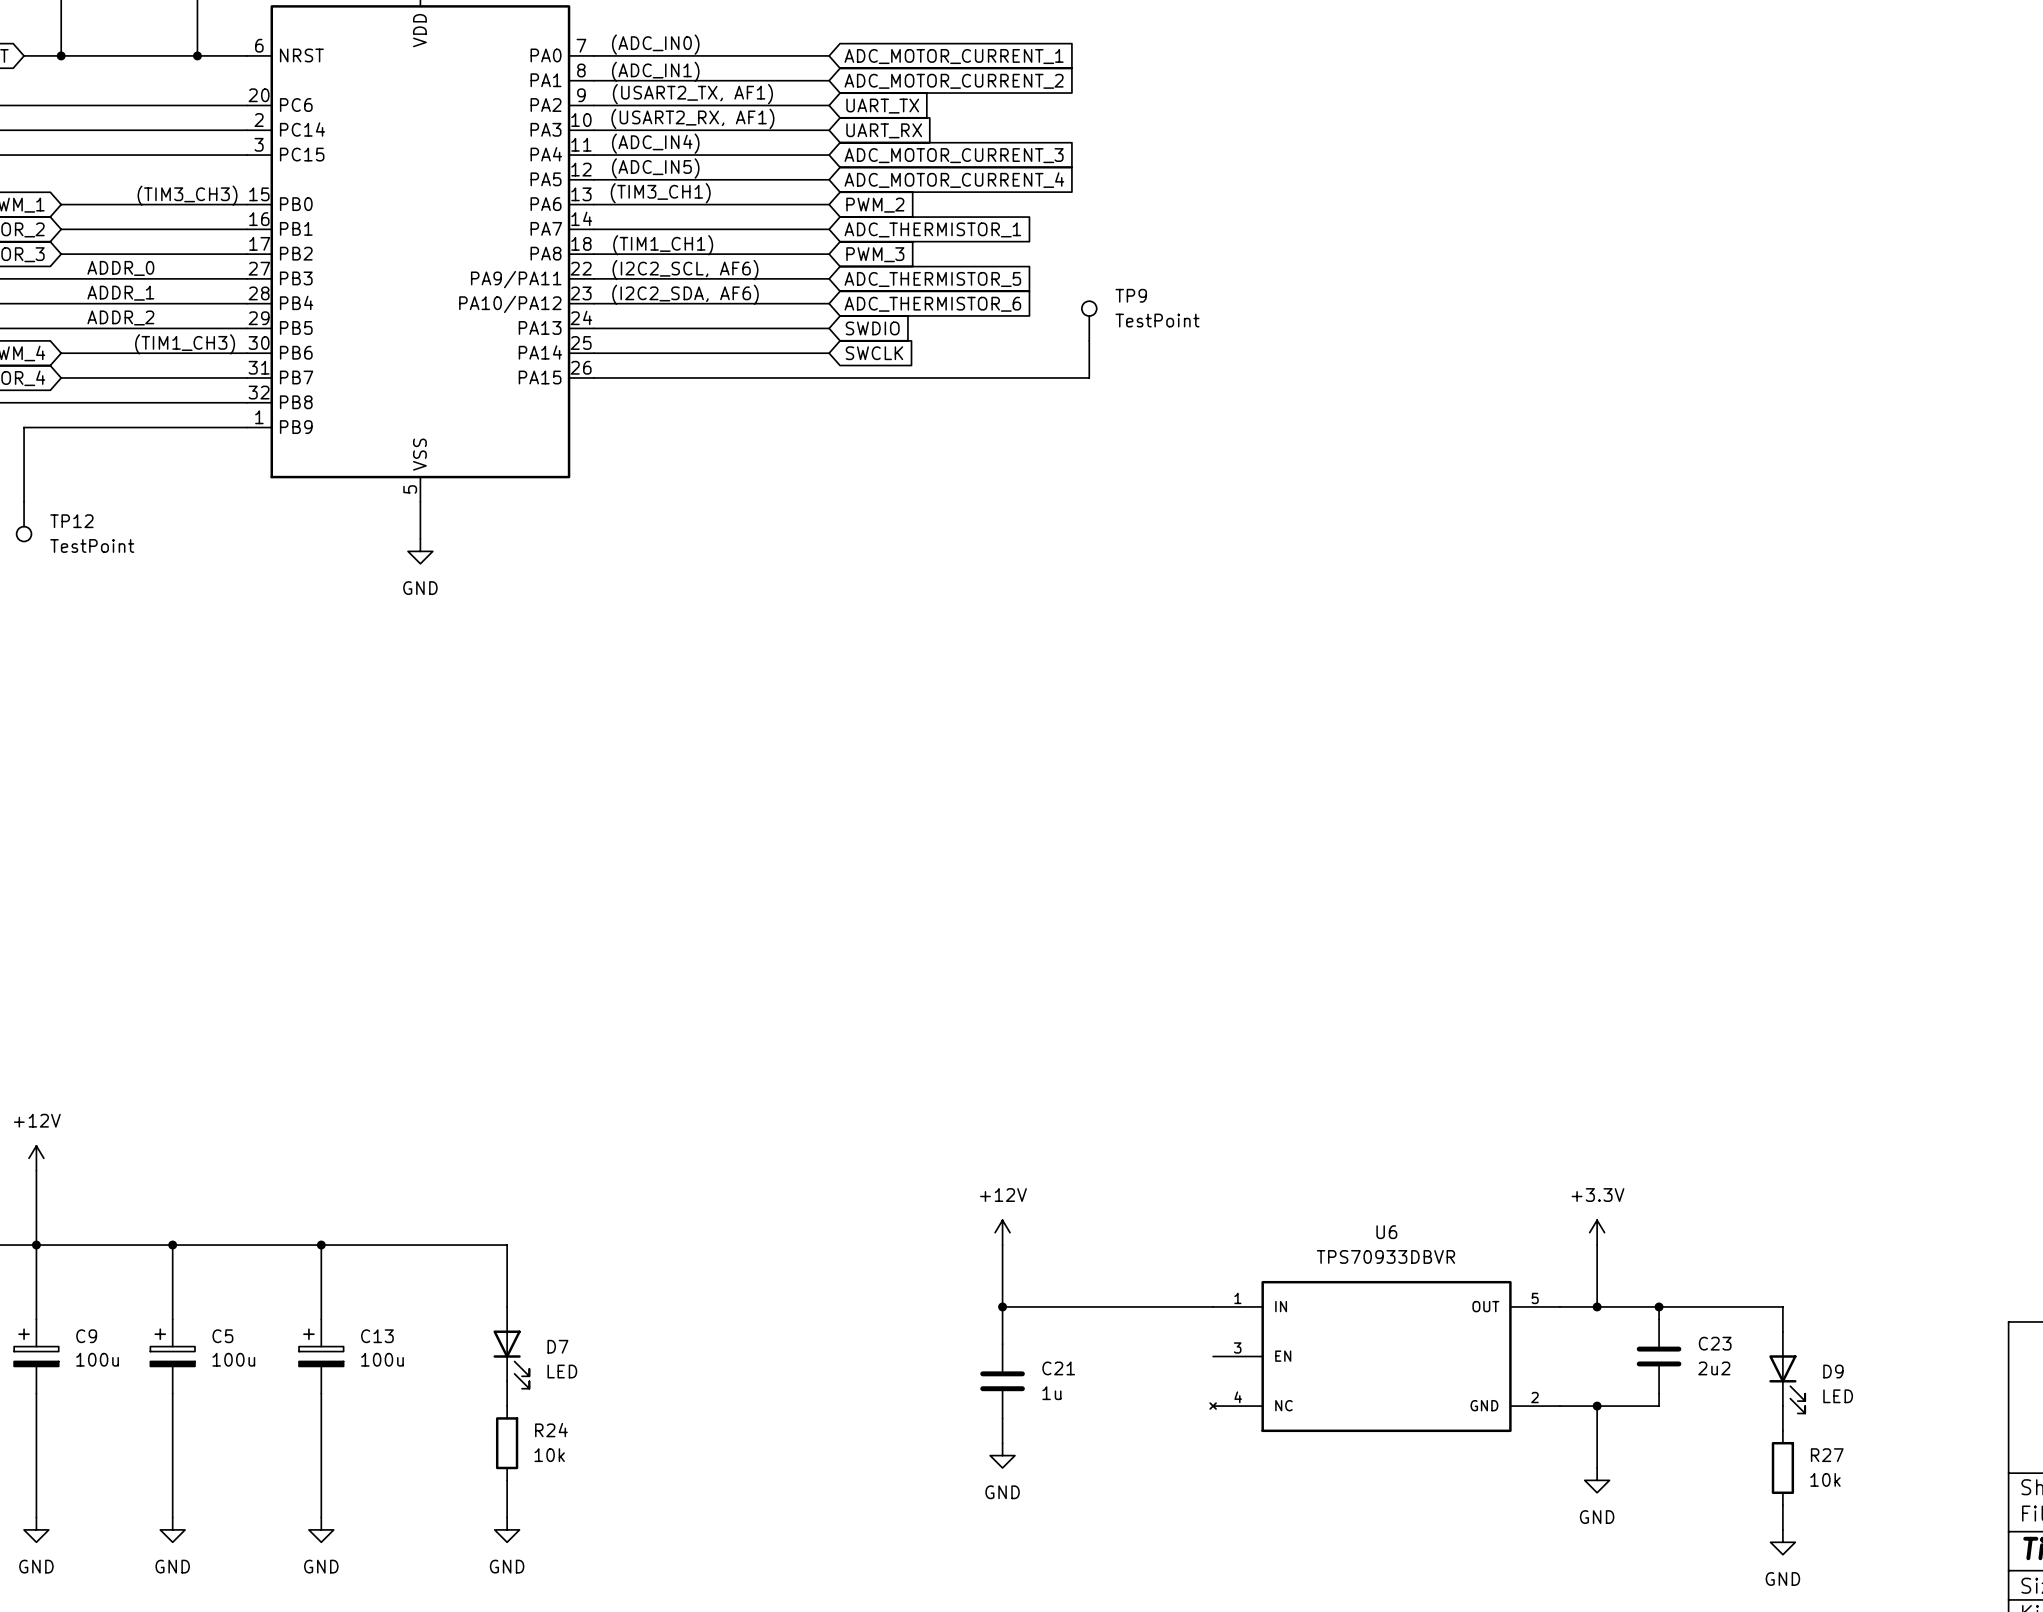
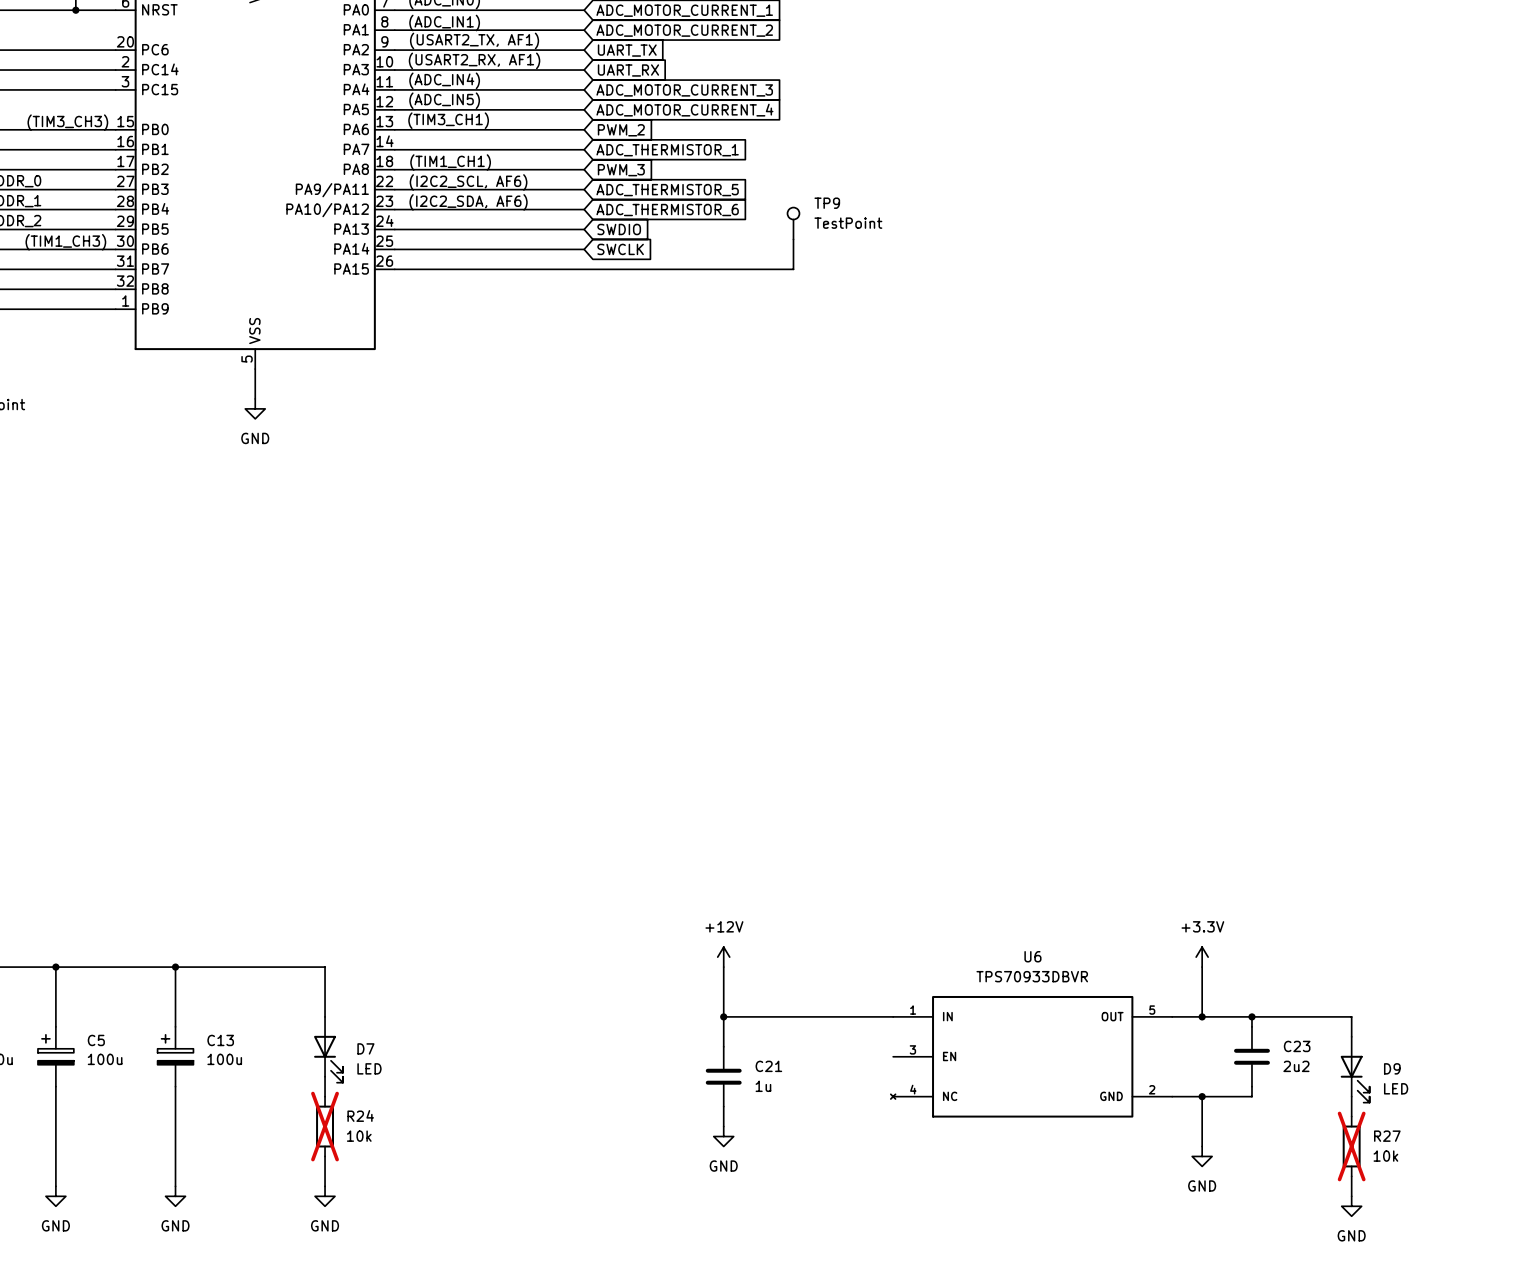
R24 do-not-place cross: none -> (325, 1126)
R27 do-not-place cross: none -> (1351, 1146)

